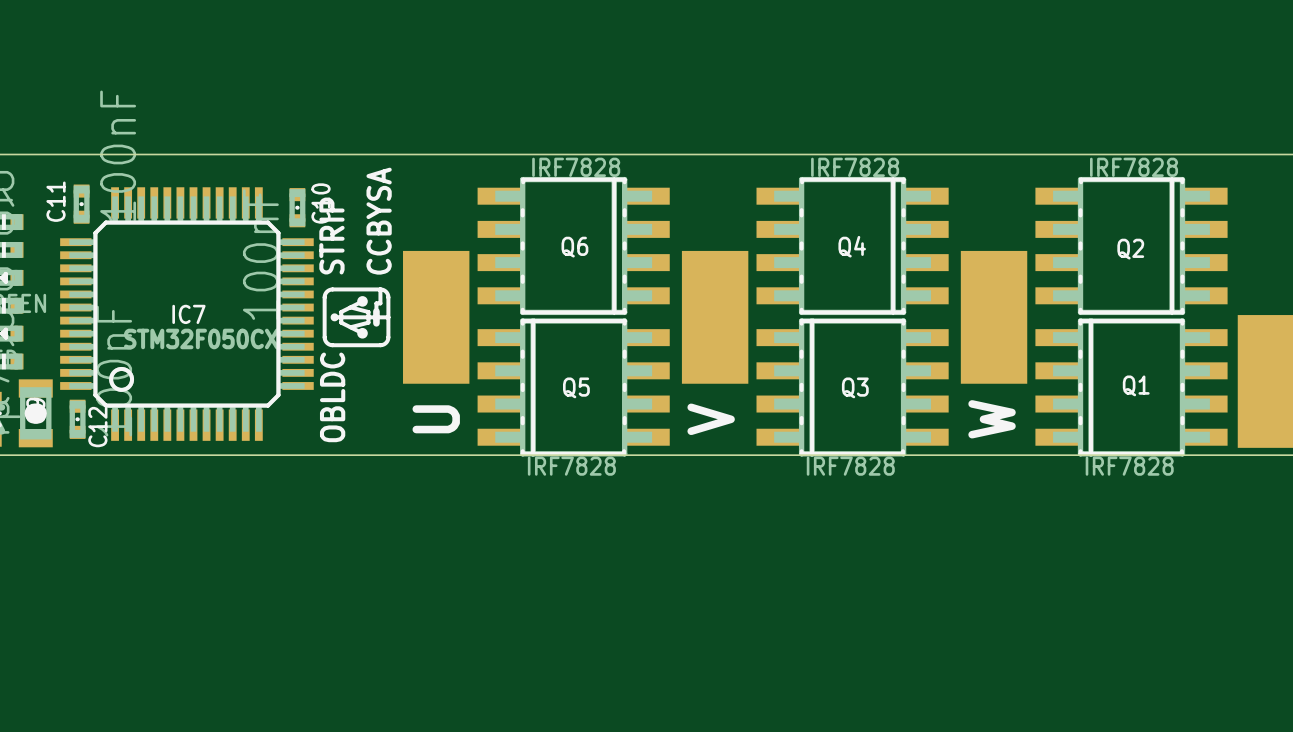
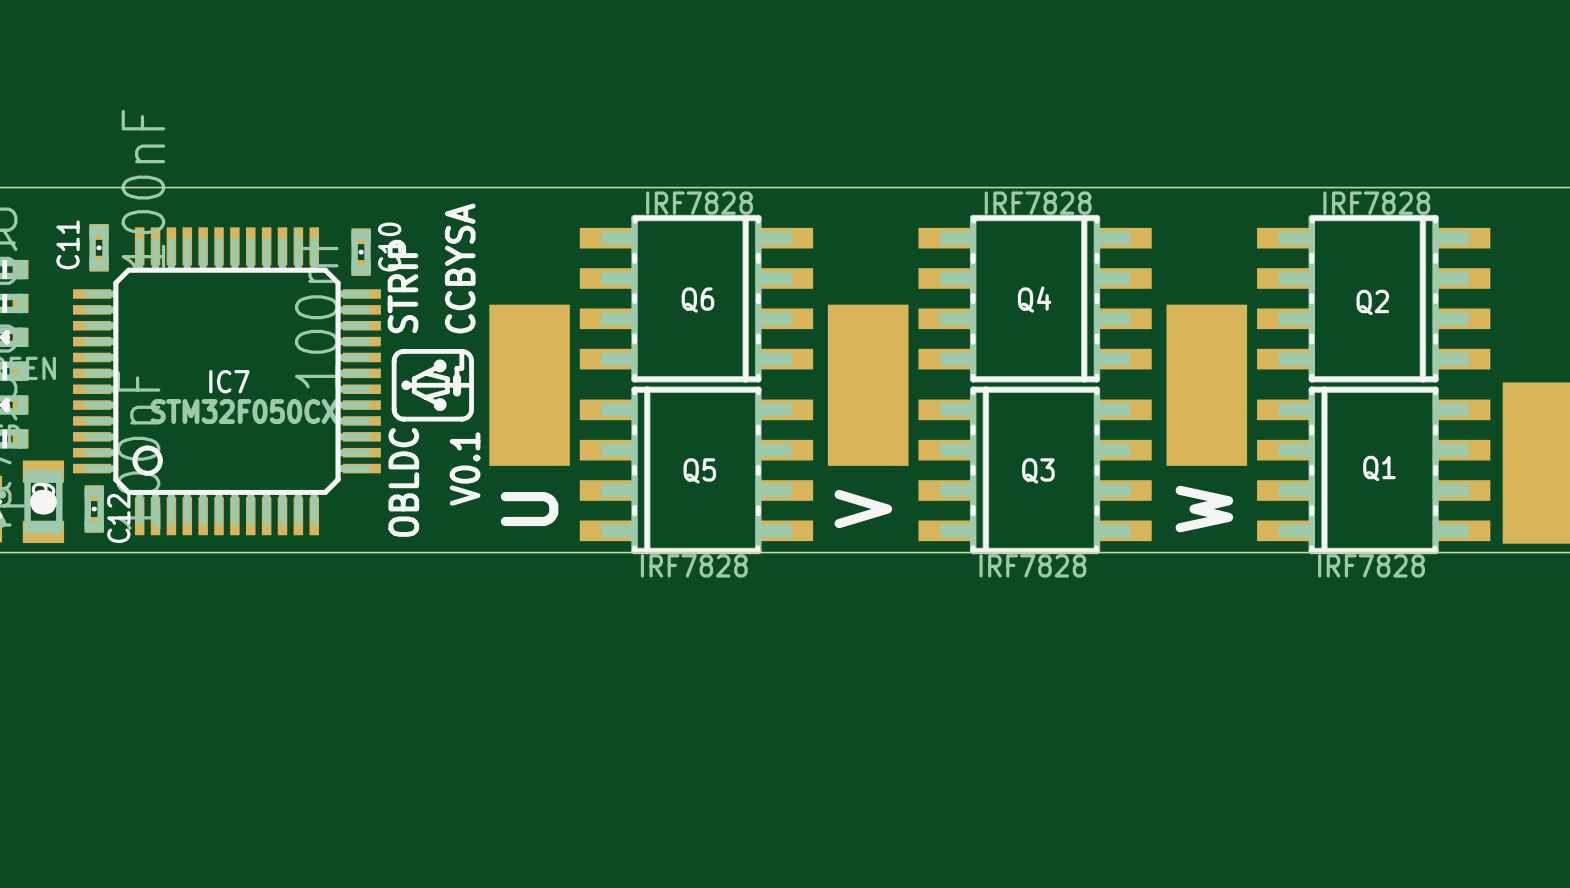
text: none -> V0.1 (465, 469)

